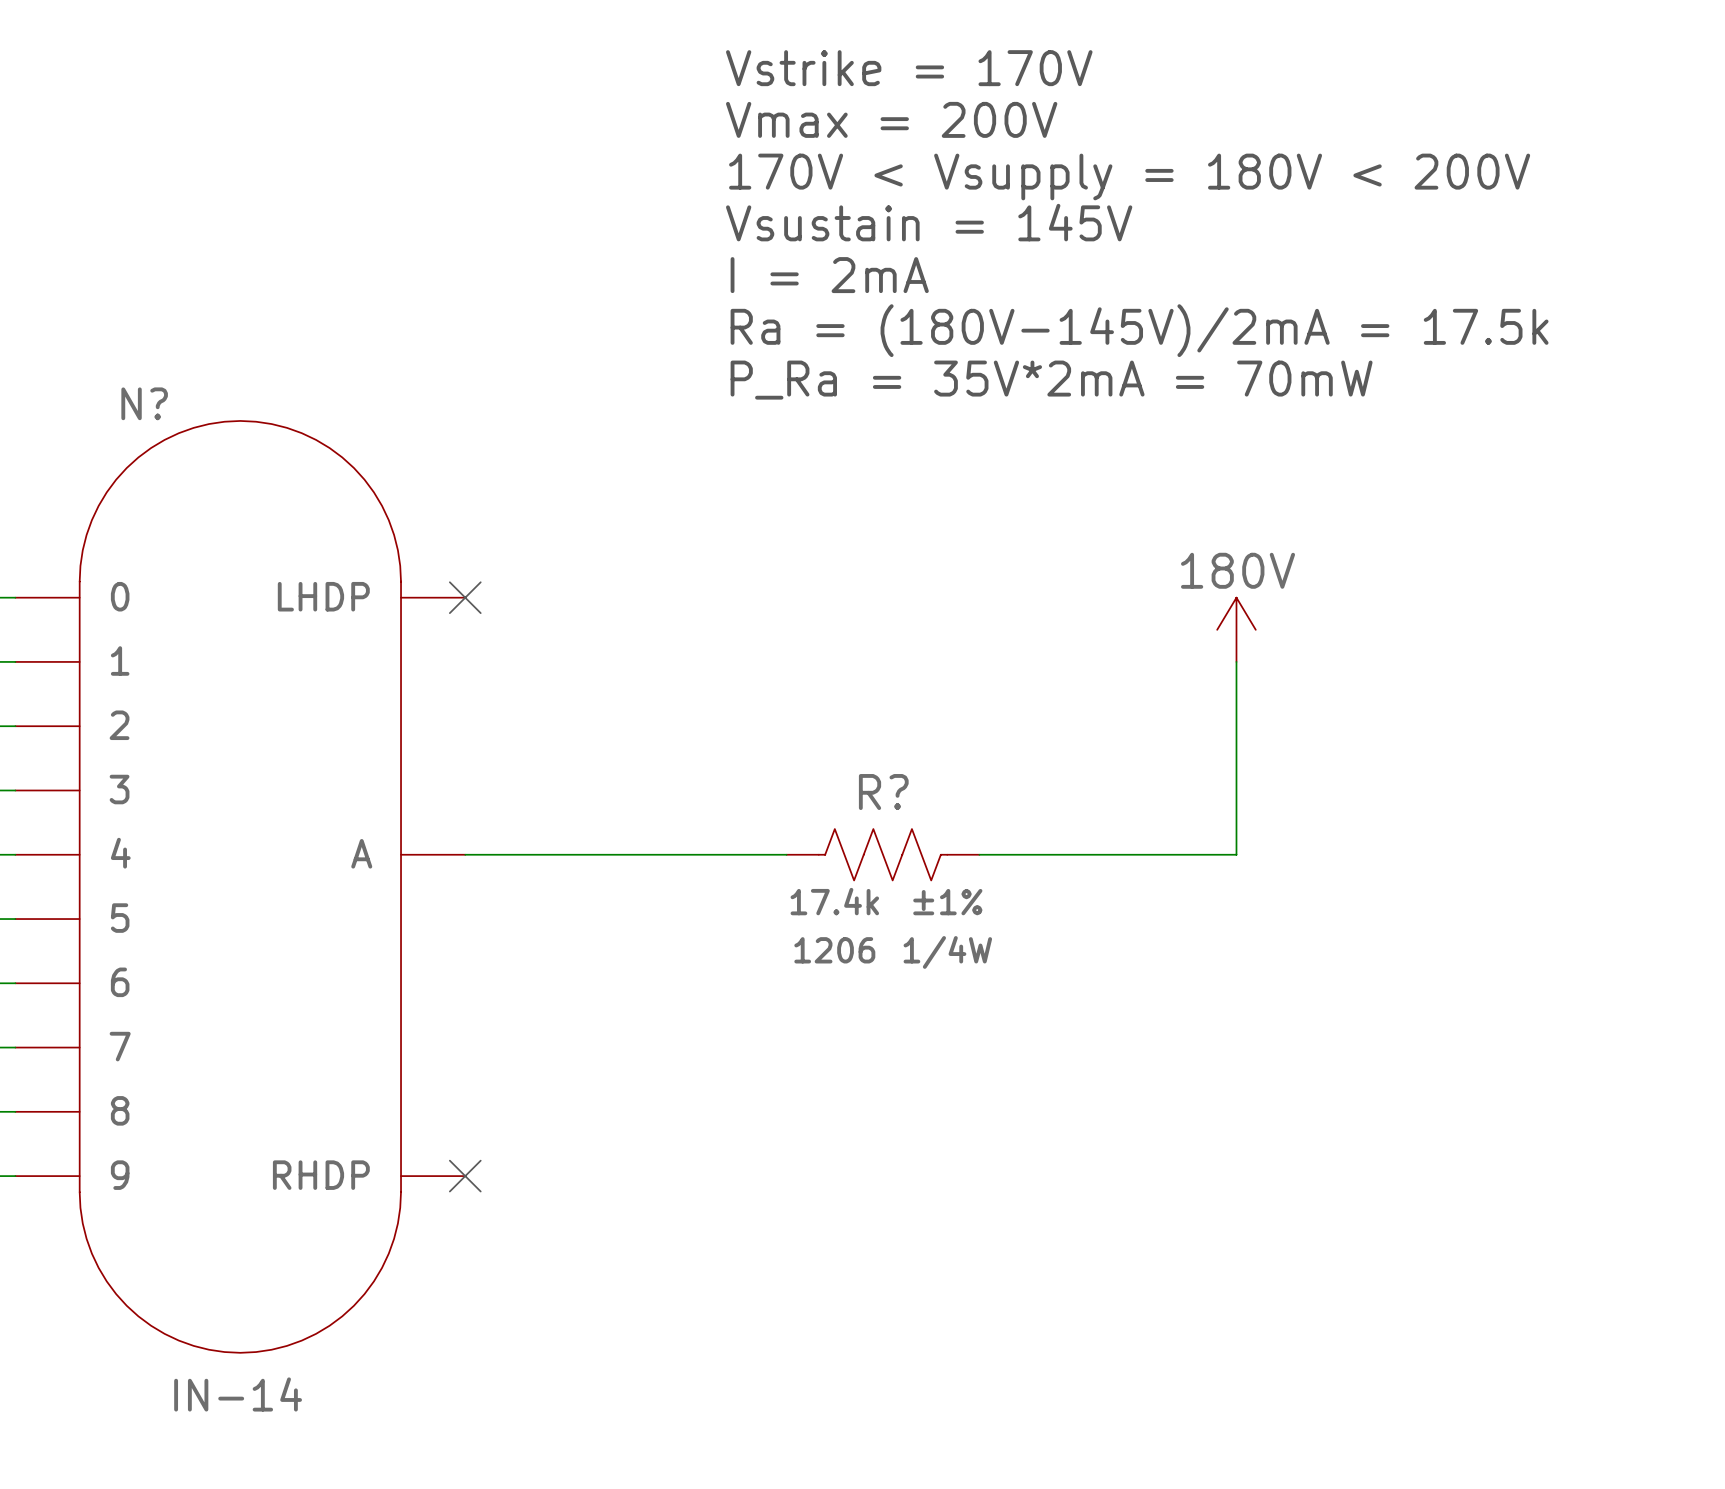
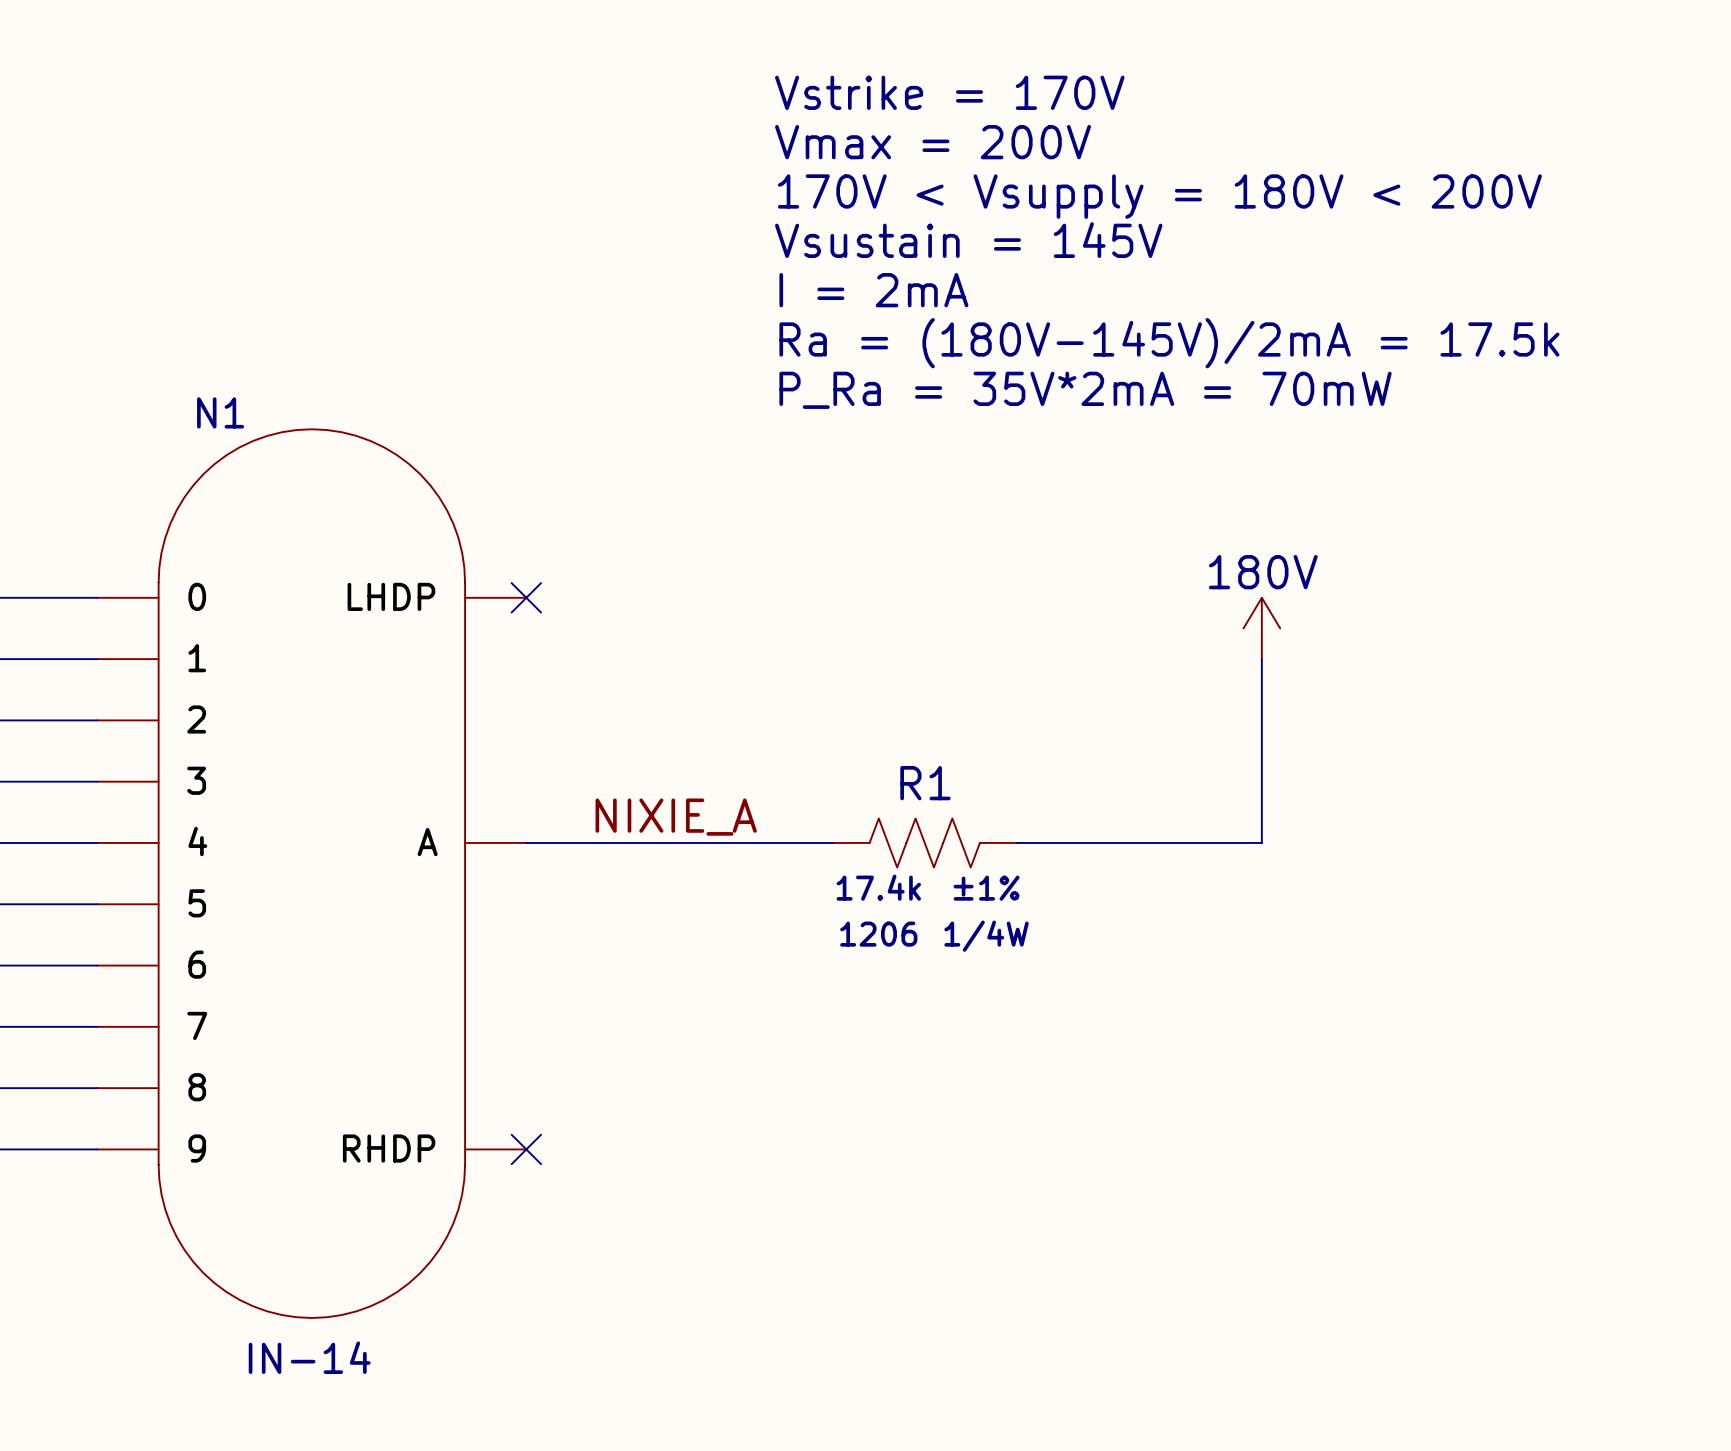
N? name: N? (144, 403) -> N1 (220, 412)
R? name: R? (883, 792) -> R1 (925, 783)
label: none -> NIXIE_A (676, 817)

